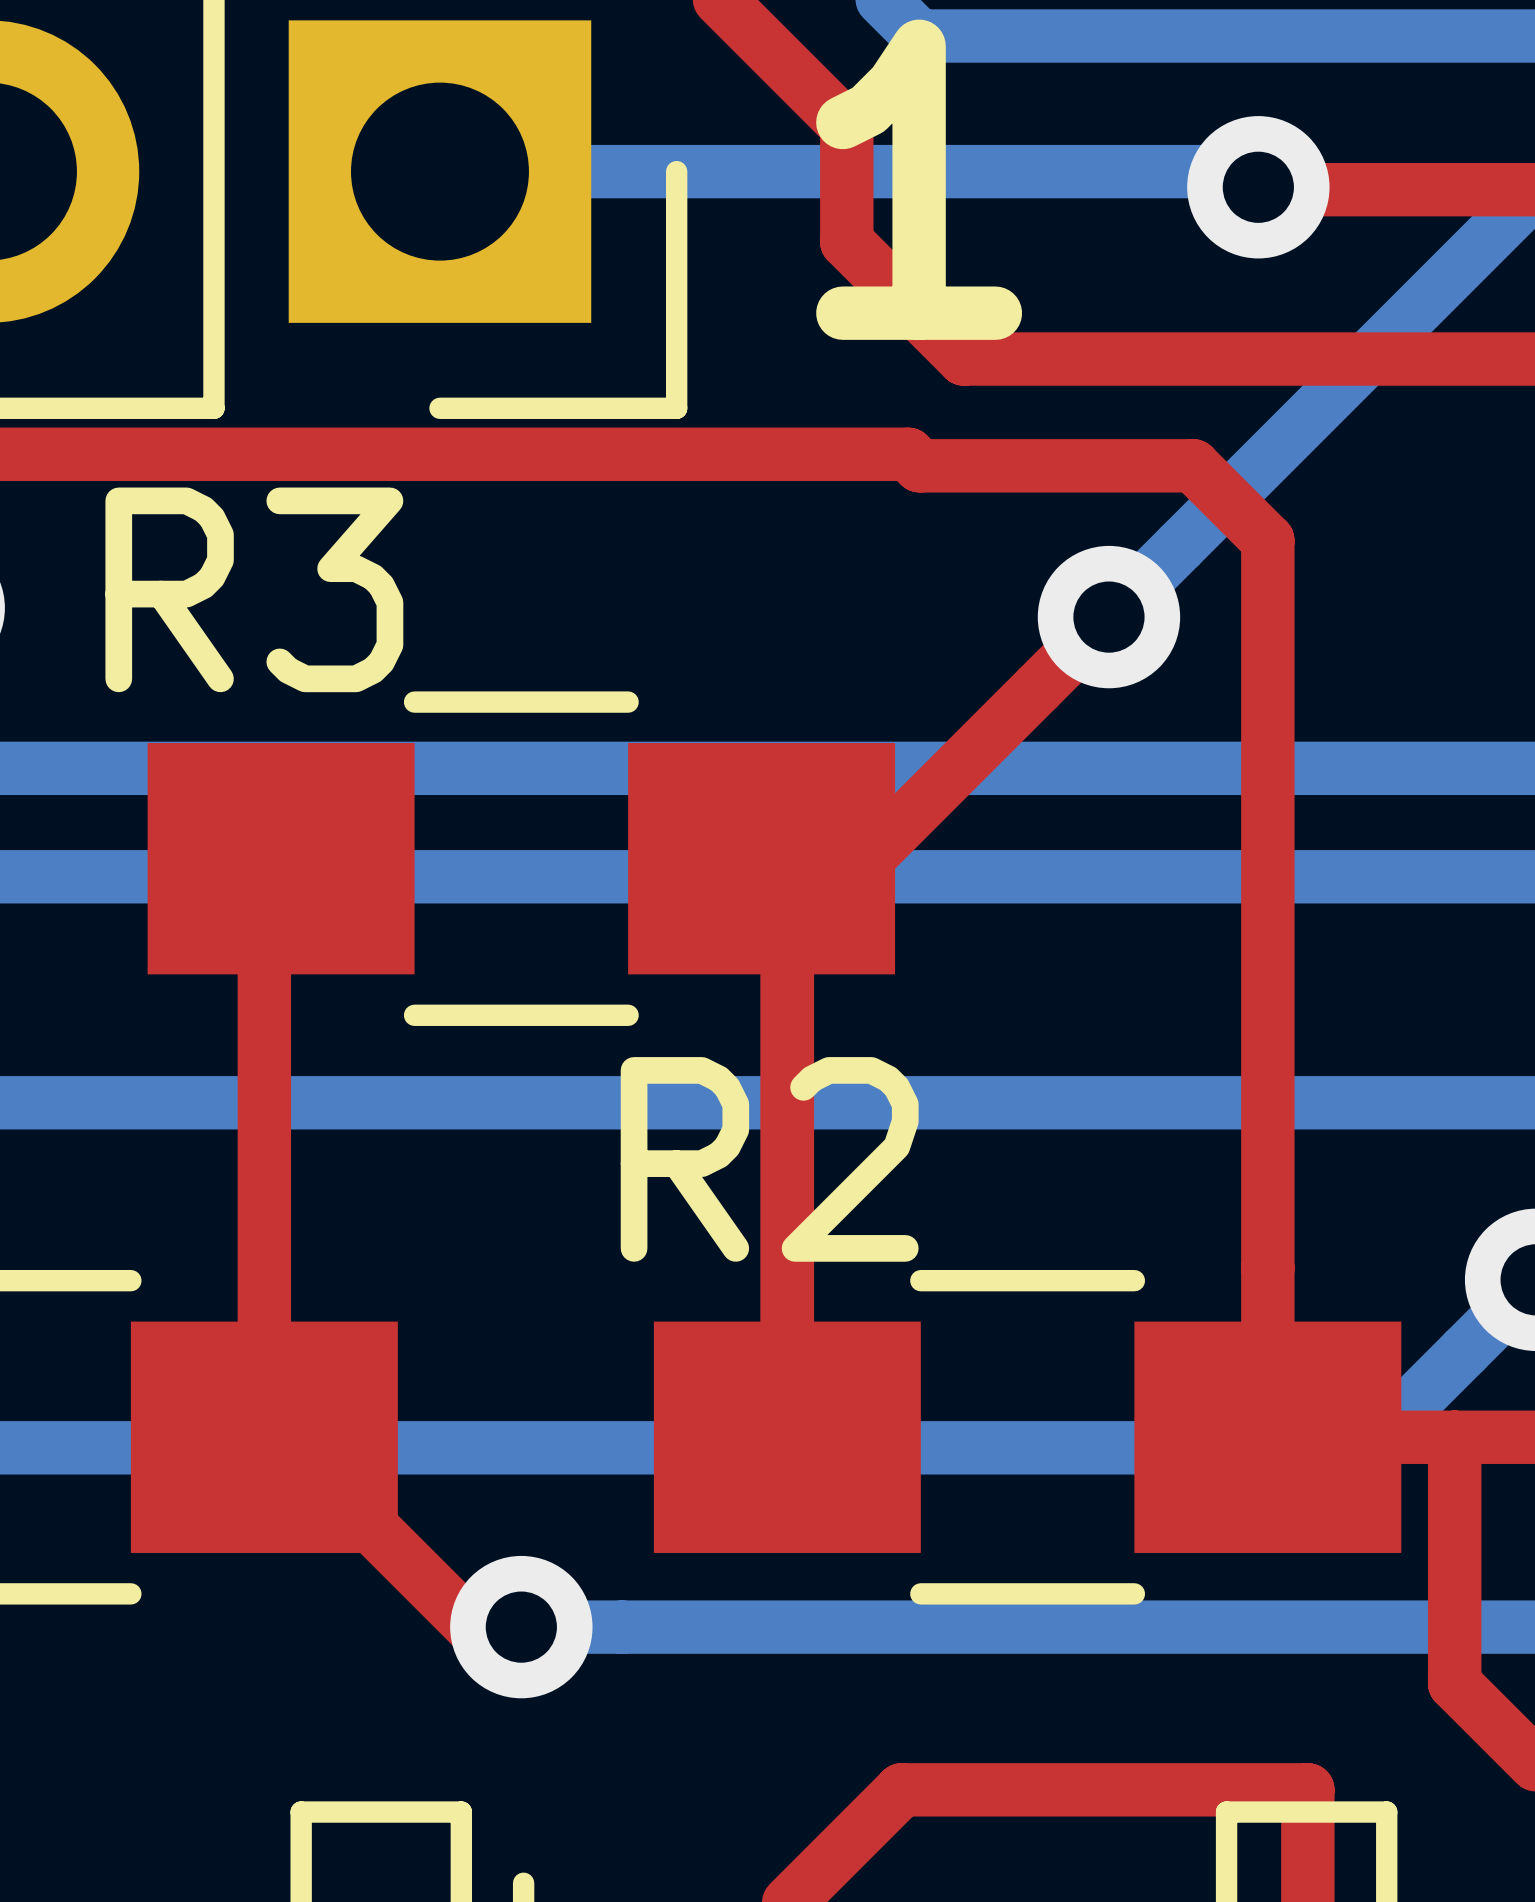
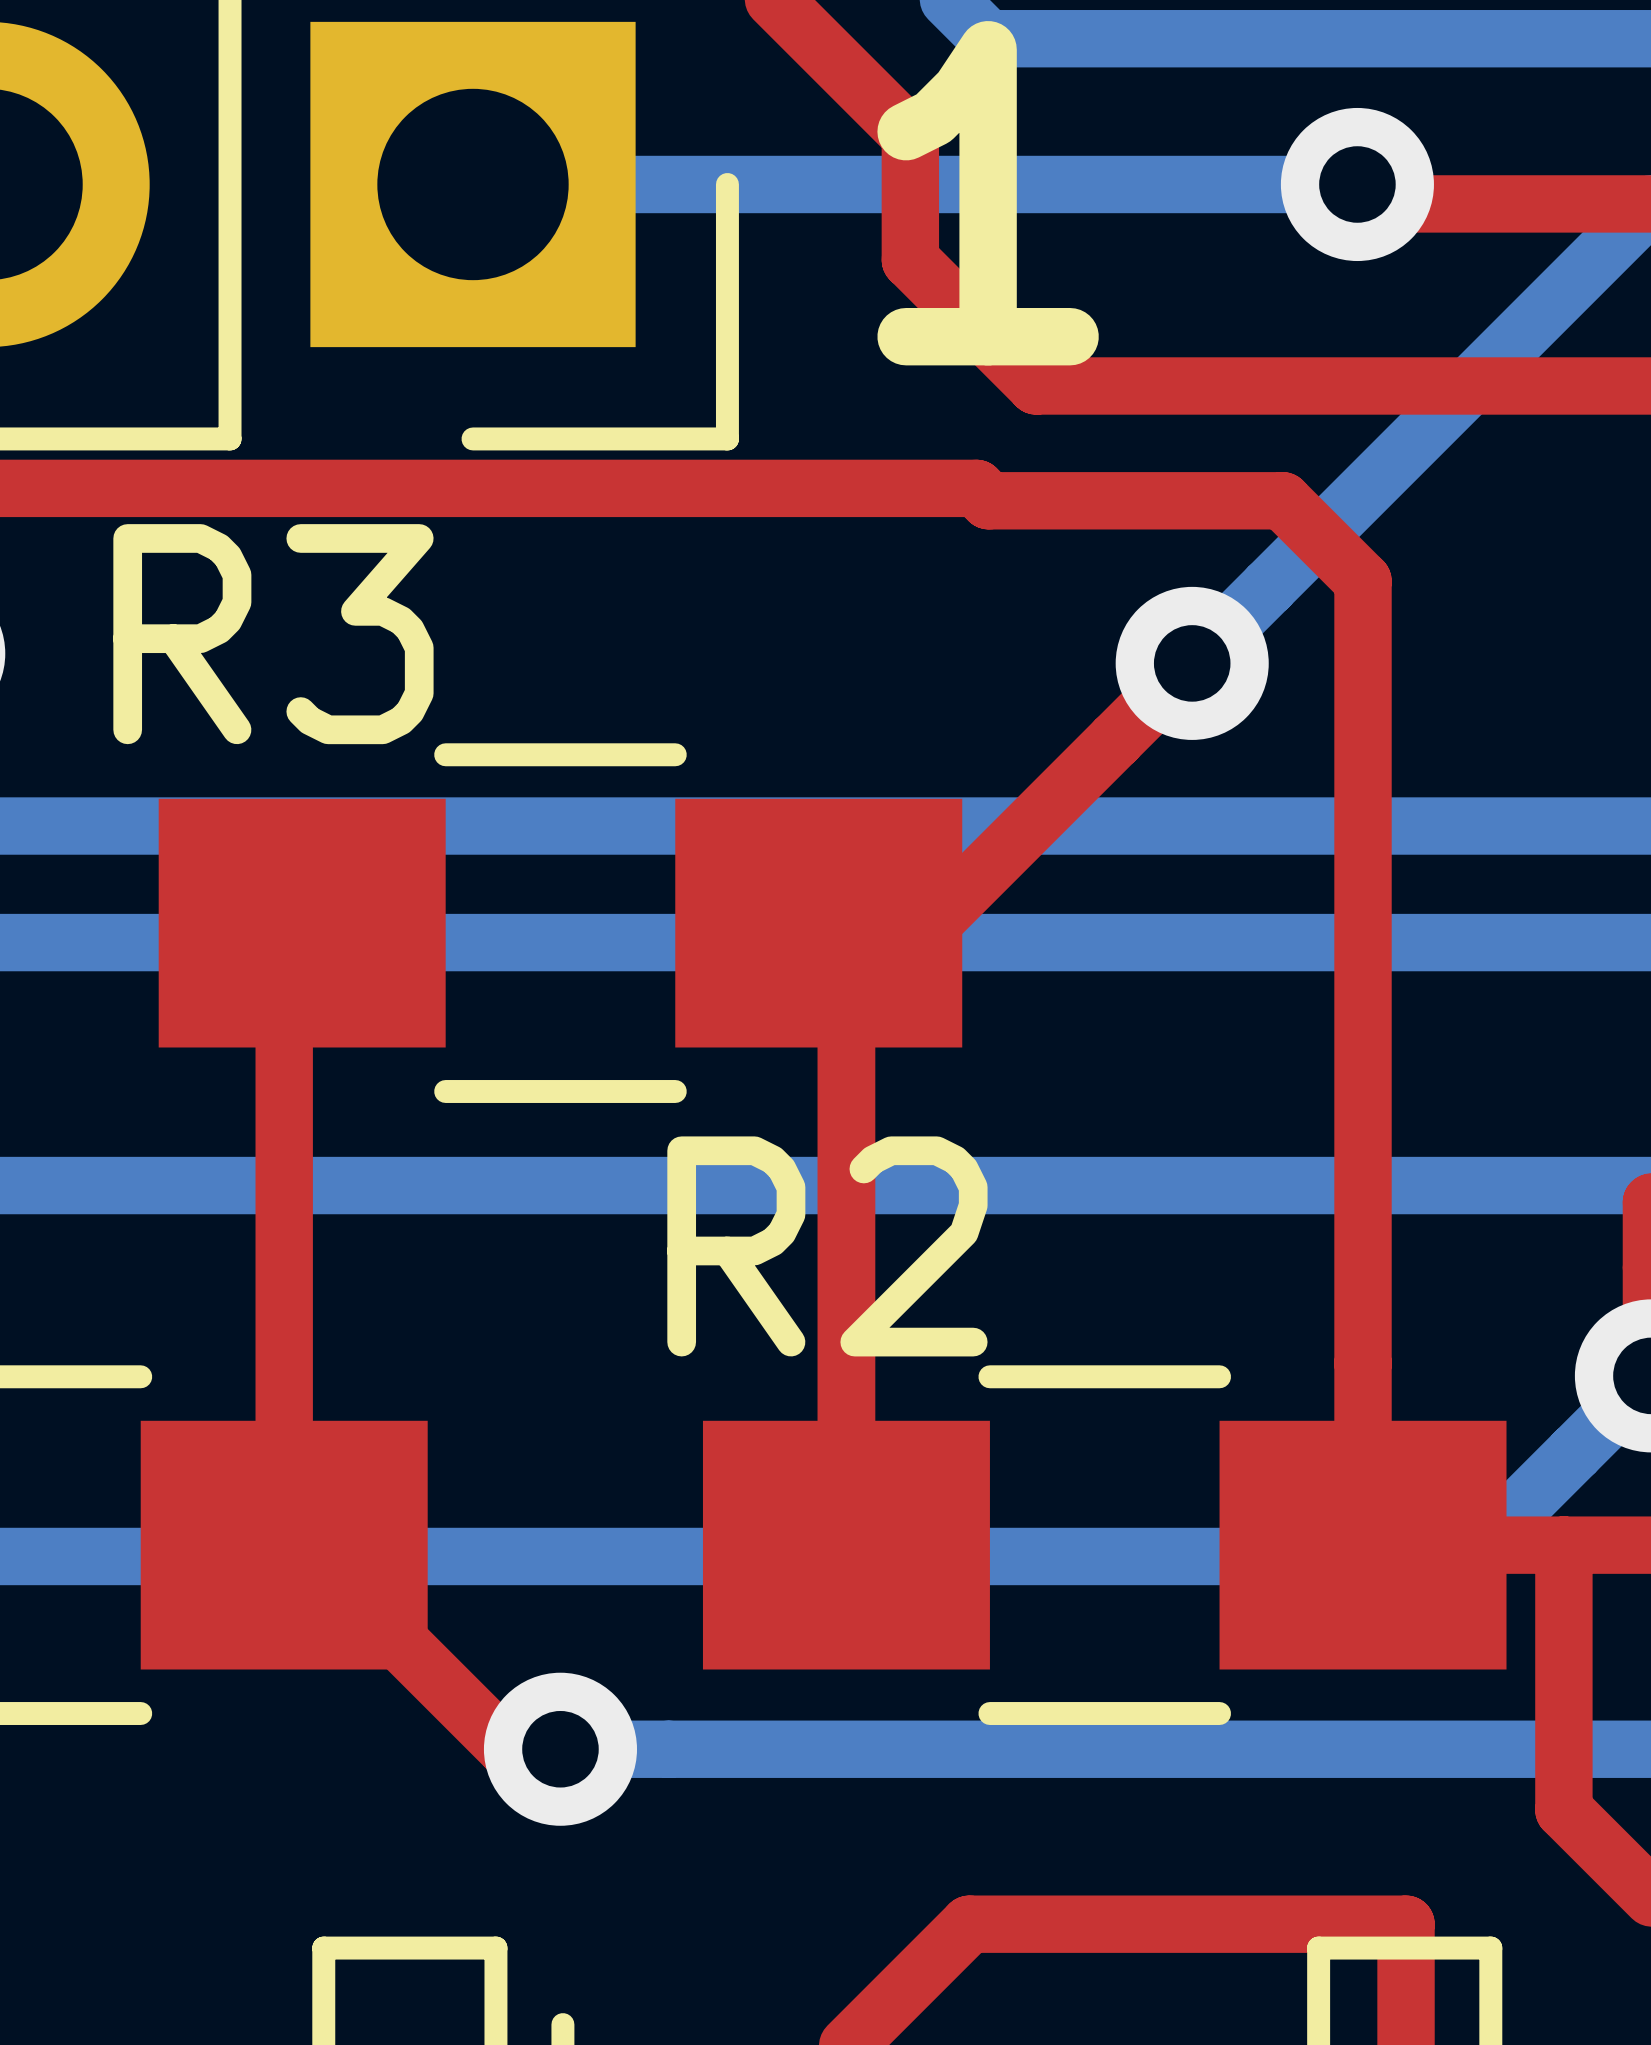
via position: (1258, 187) -> (1357, 184)

